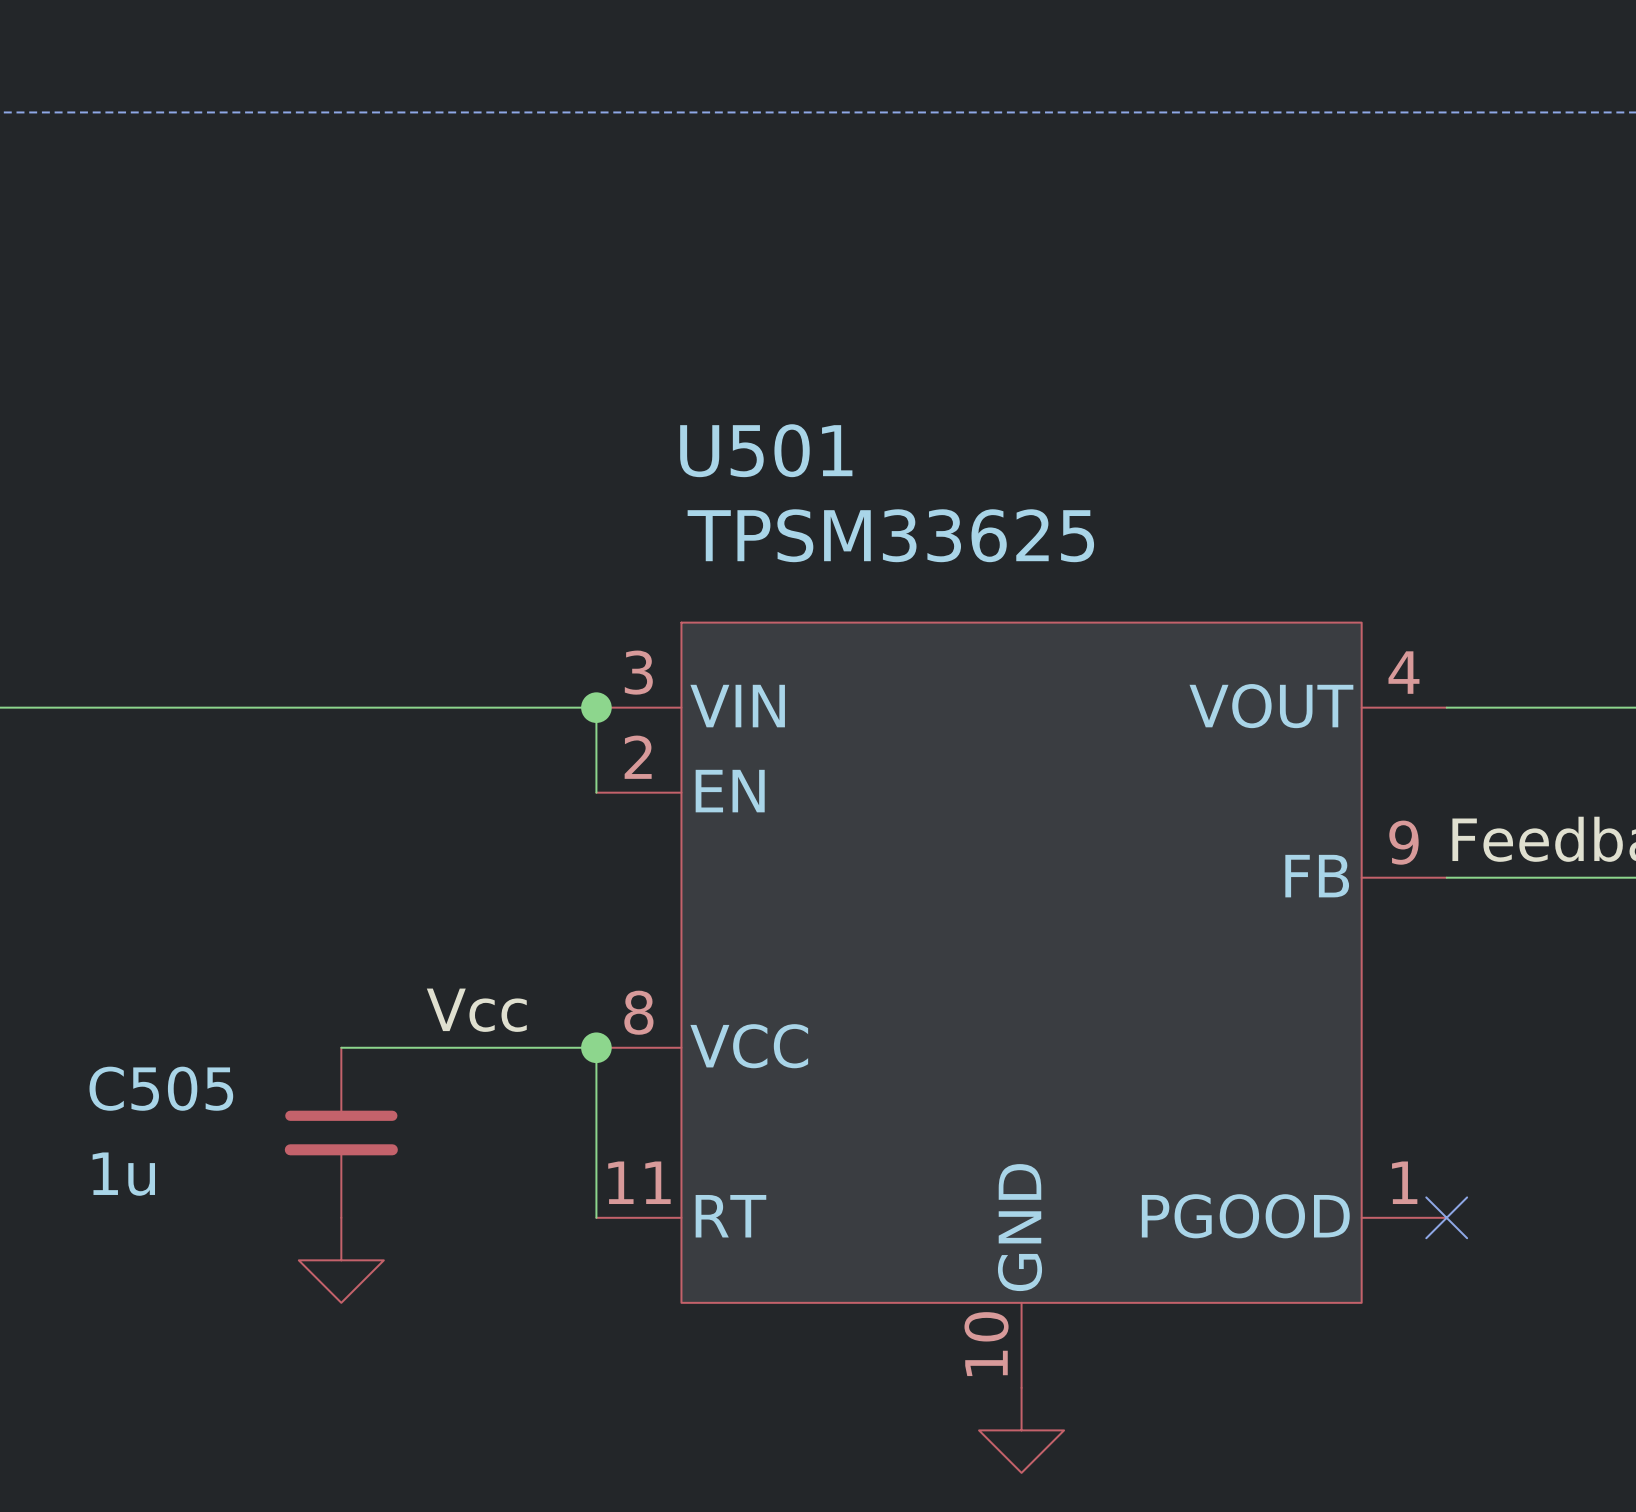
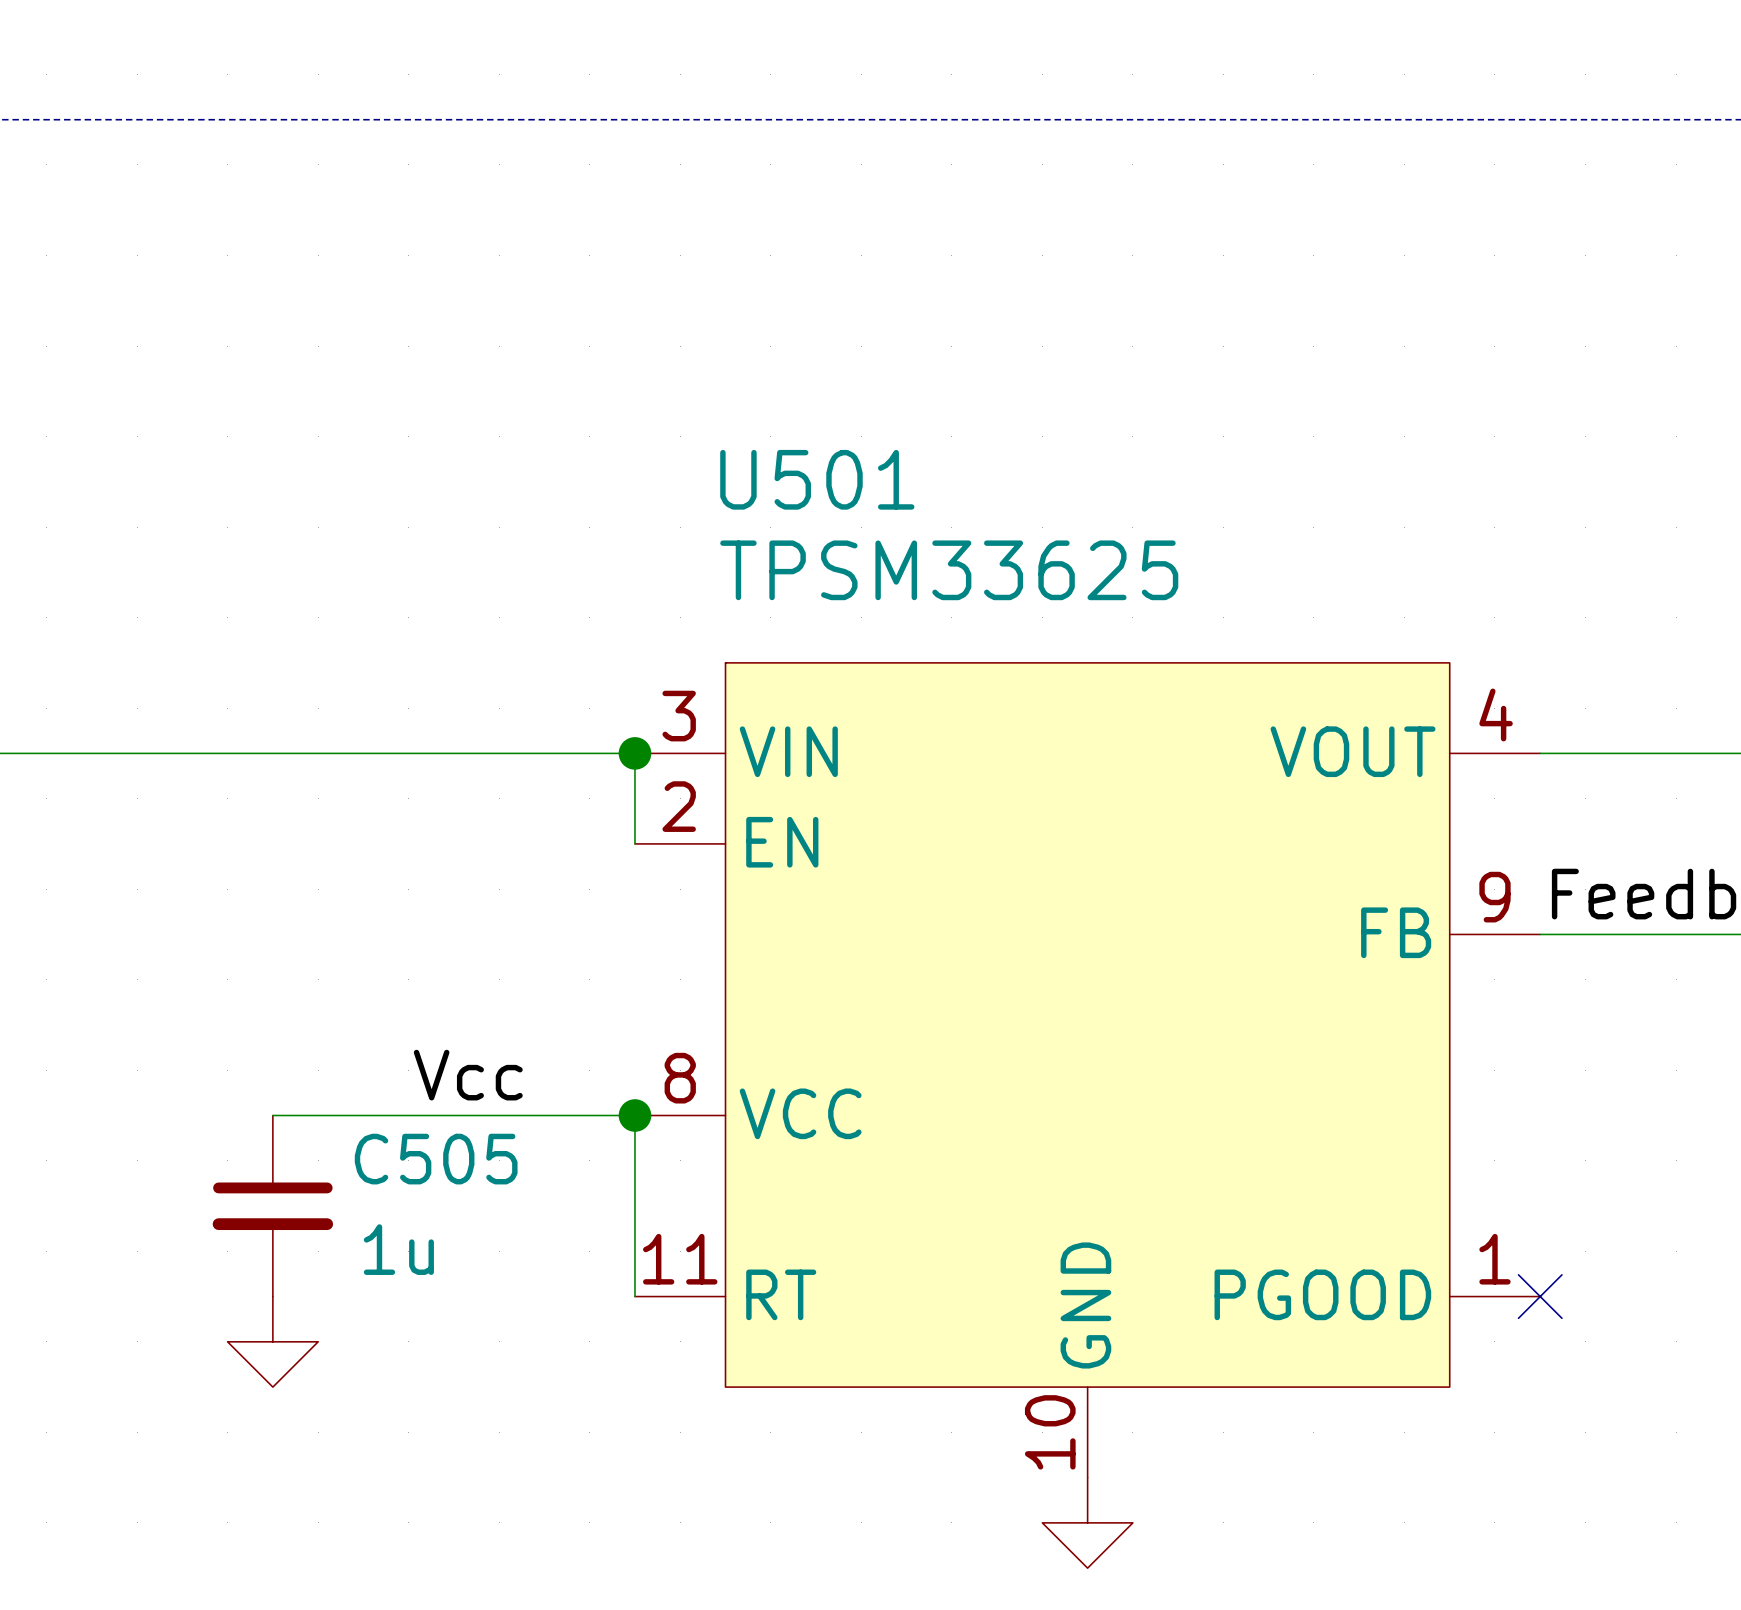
label position: Vcc (476, 1010) -> Vcc (468, 1075)
wire: none -> (272, 1115) (363, 1115)
C505 name position: C505 (161, 1088) -> C505 (436, 1159)
C505 position: (341, 1132) -> (272, 1206)
C505 value position: 1u (123, 1174) -> 1u (398, 1249)
power symbol position: (341, 1260) -> (272, 1341)

